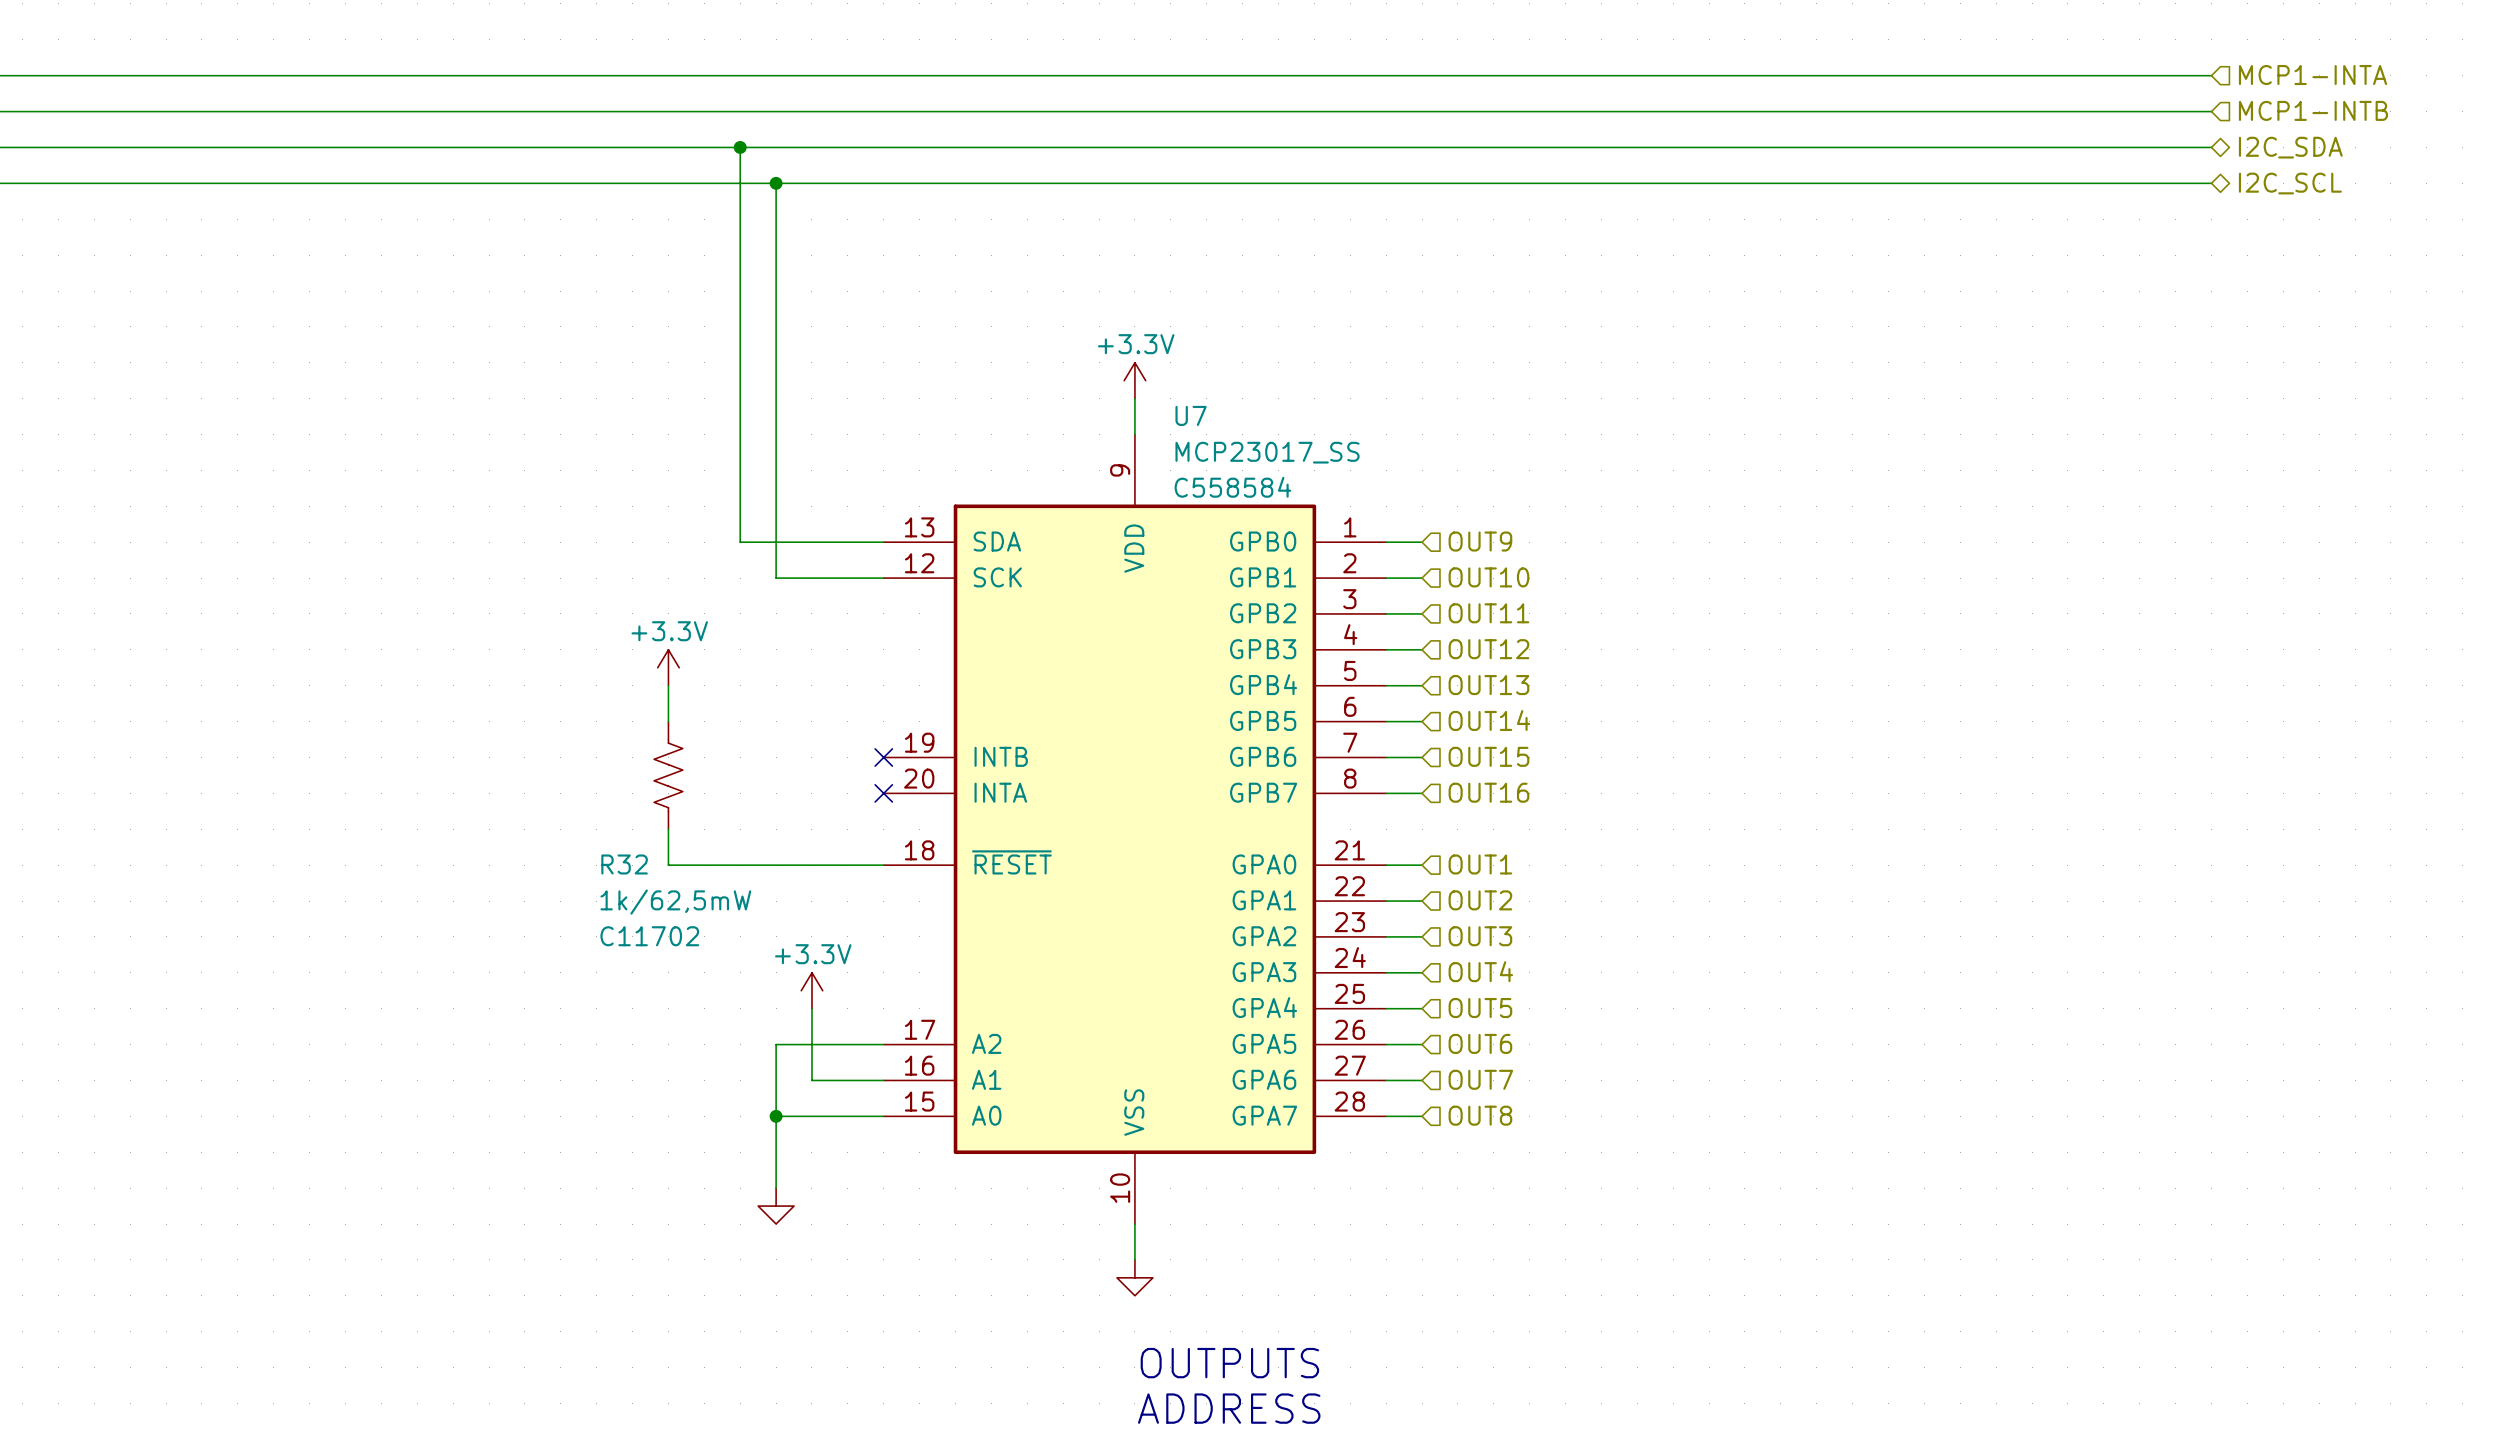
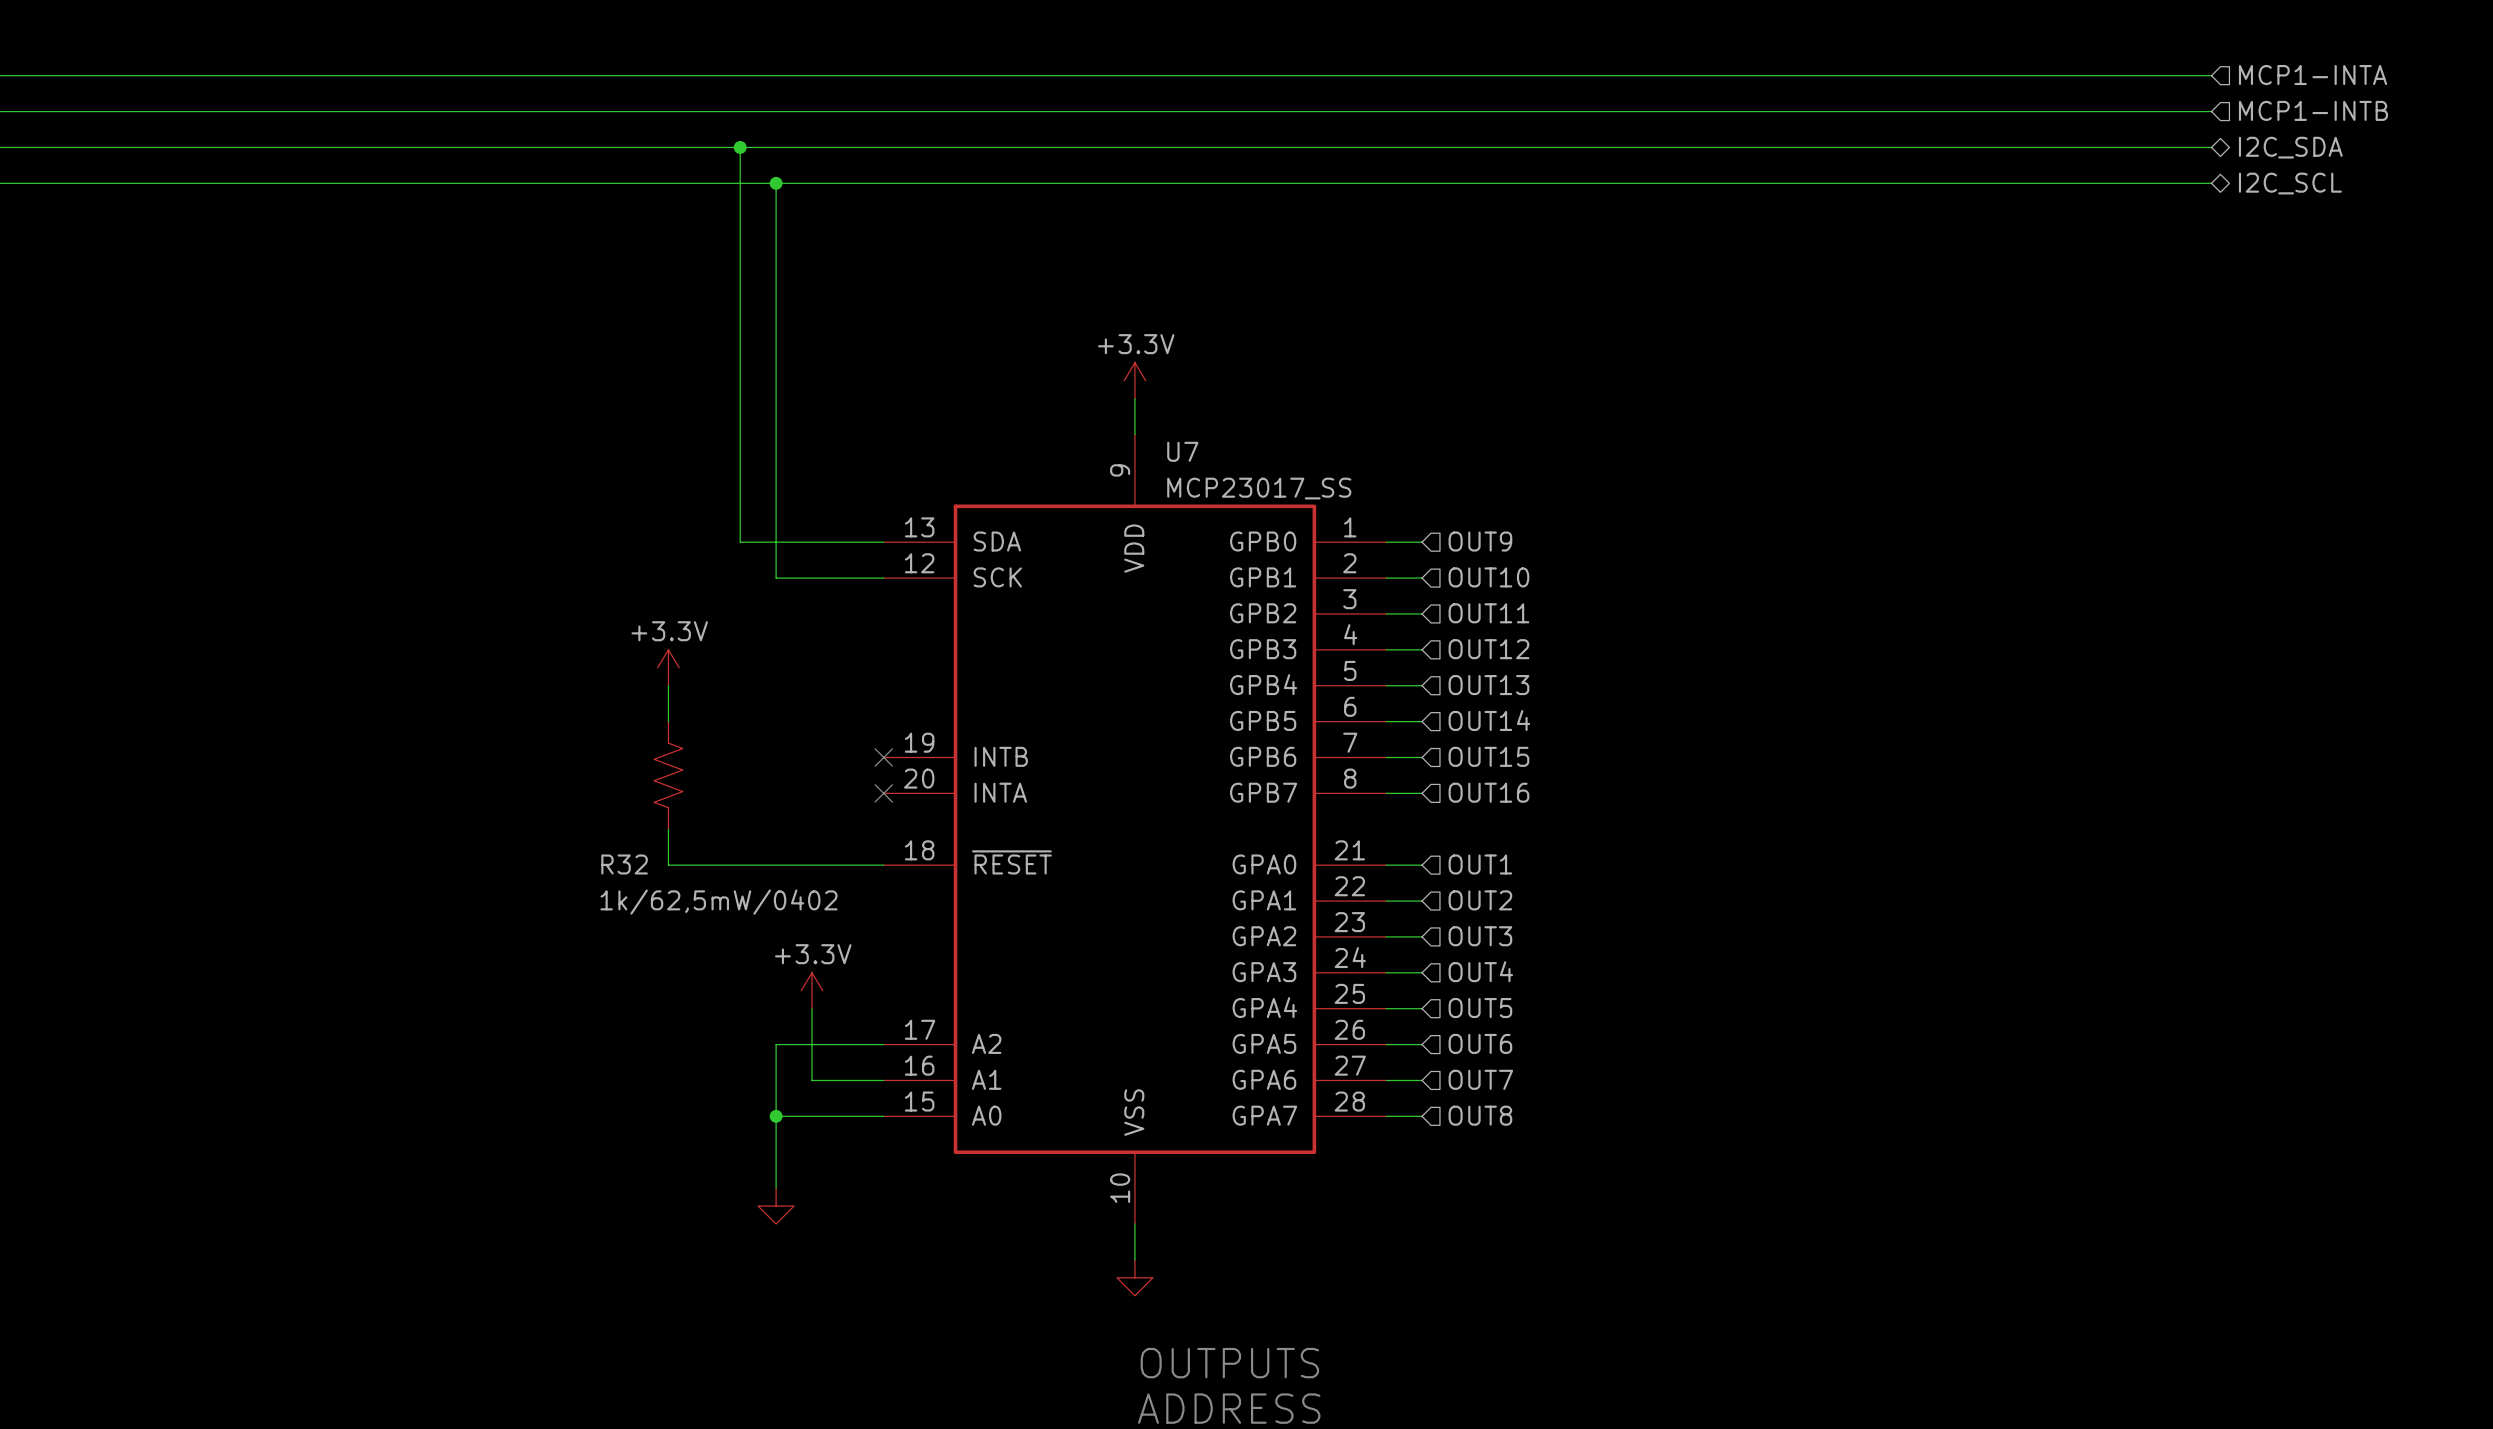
U7 name position: U7 (1191, 415) -> U7 (1182, 451)
U7 value position: MCP23017_SS (1267, 452) -> MCP23017_SS (1259, 488)
U7 text: C558584 (1232, 487) -> none
R32 value: 1k/62,5mW (675, 902) -> 1k/62,5mW/0402 (718, 902)
R32 text: C11702 (649, 936) -> none

